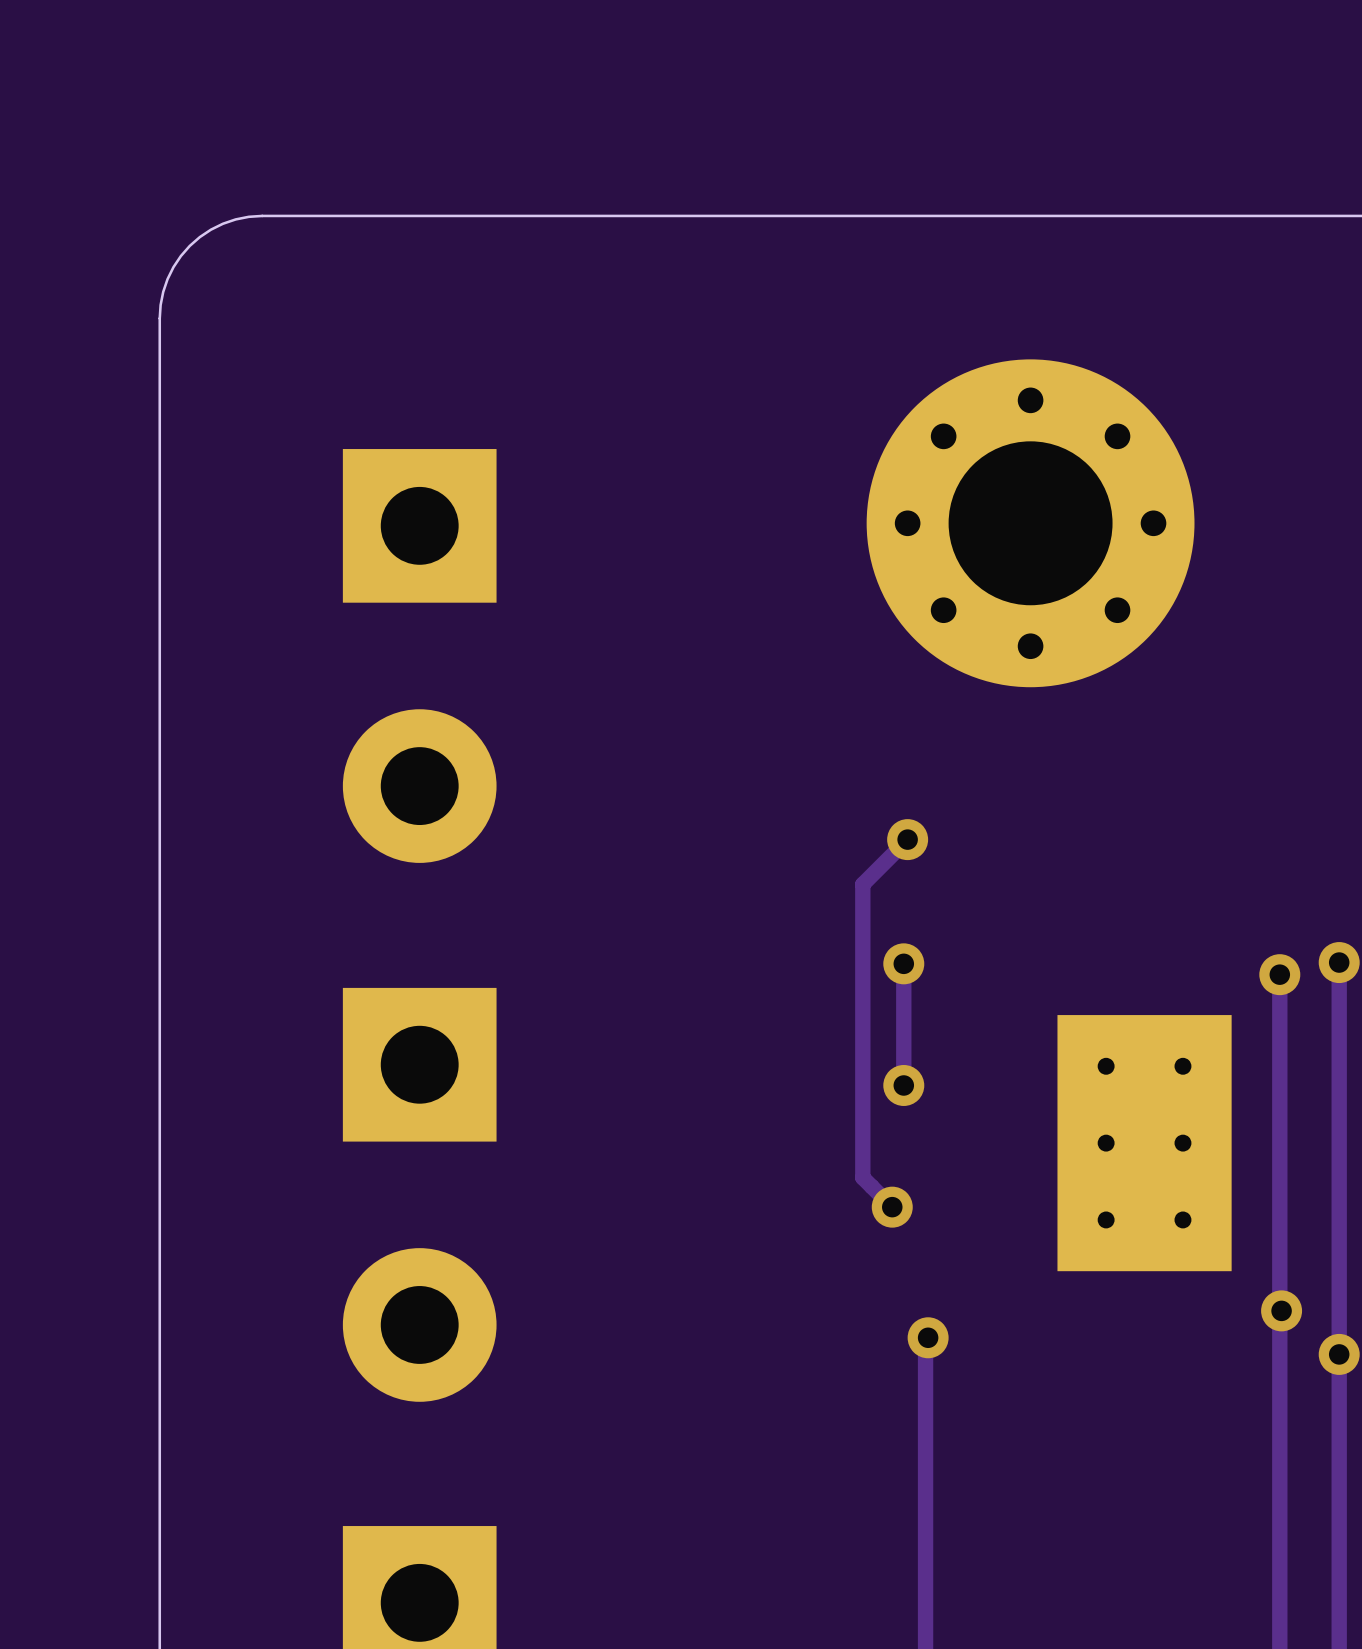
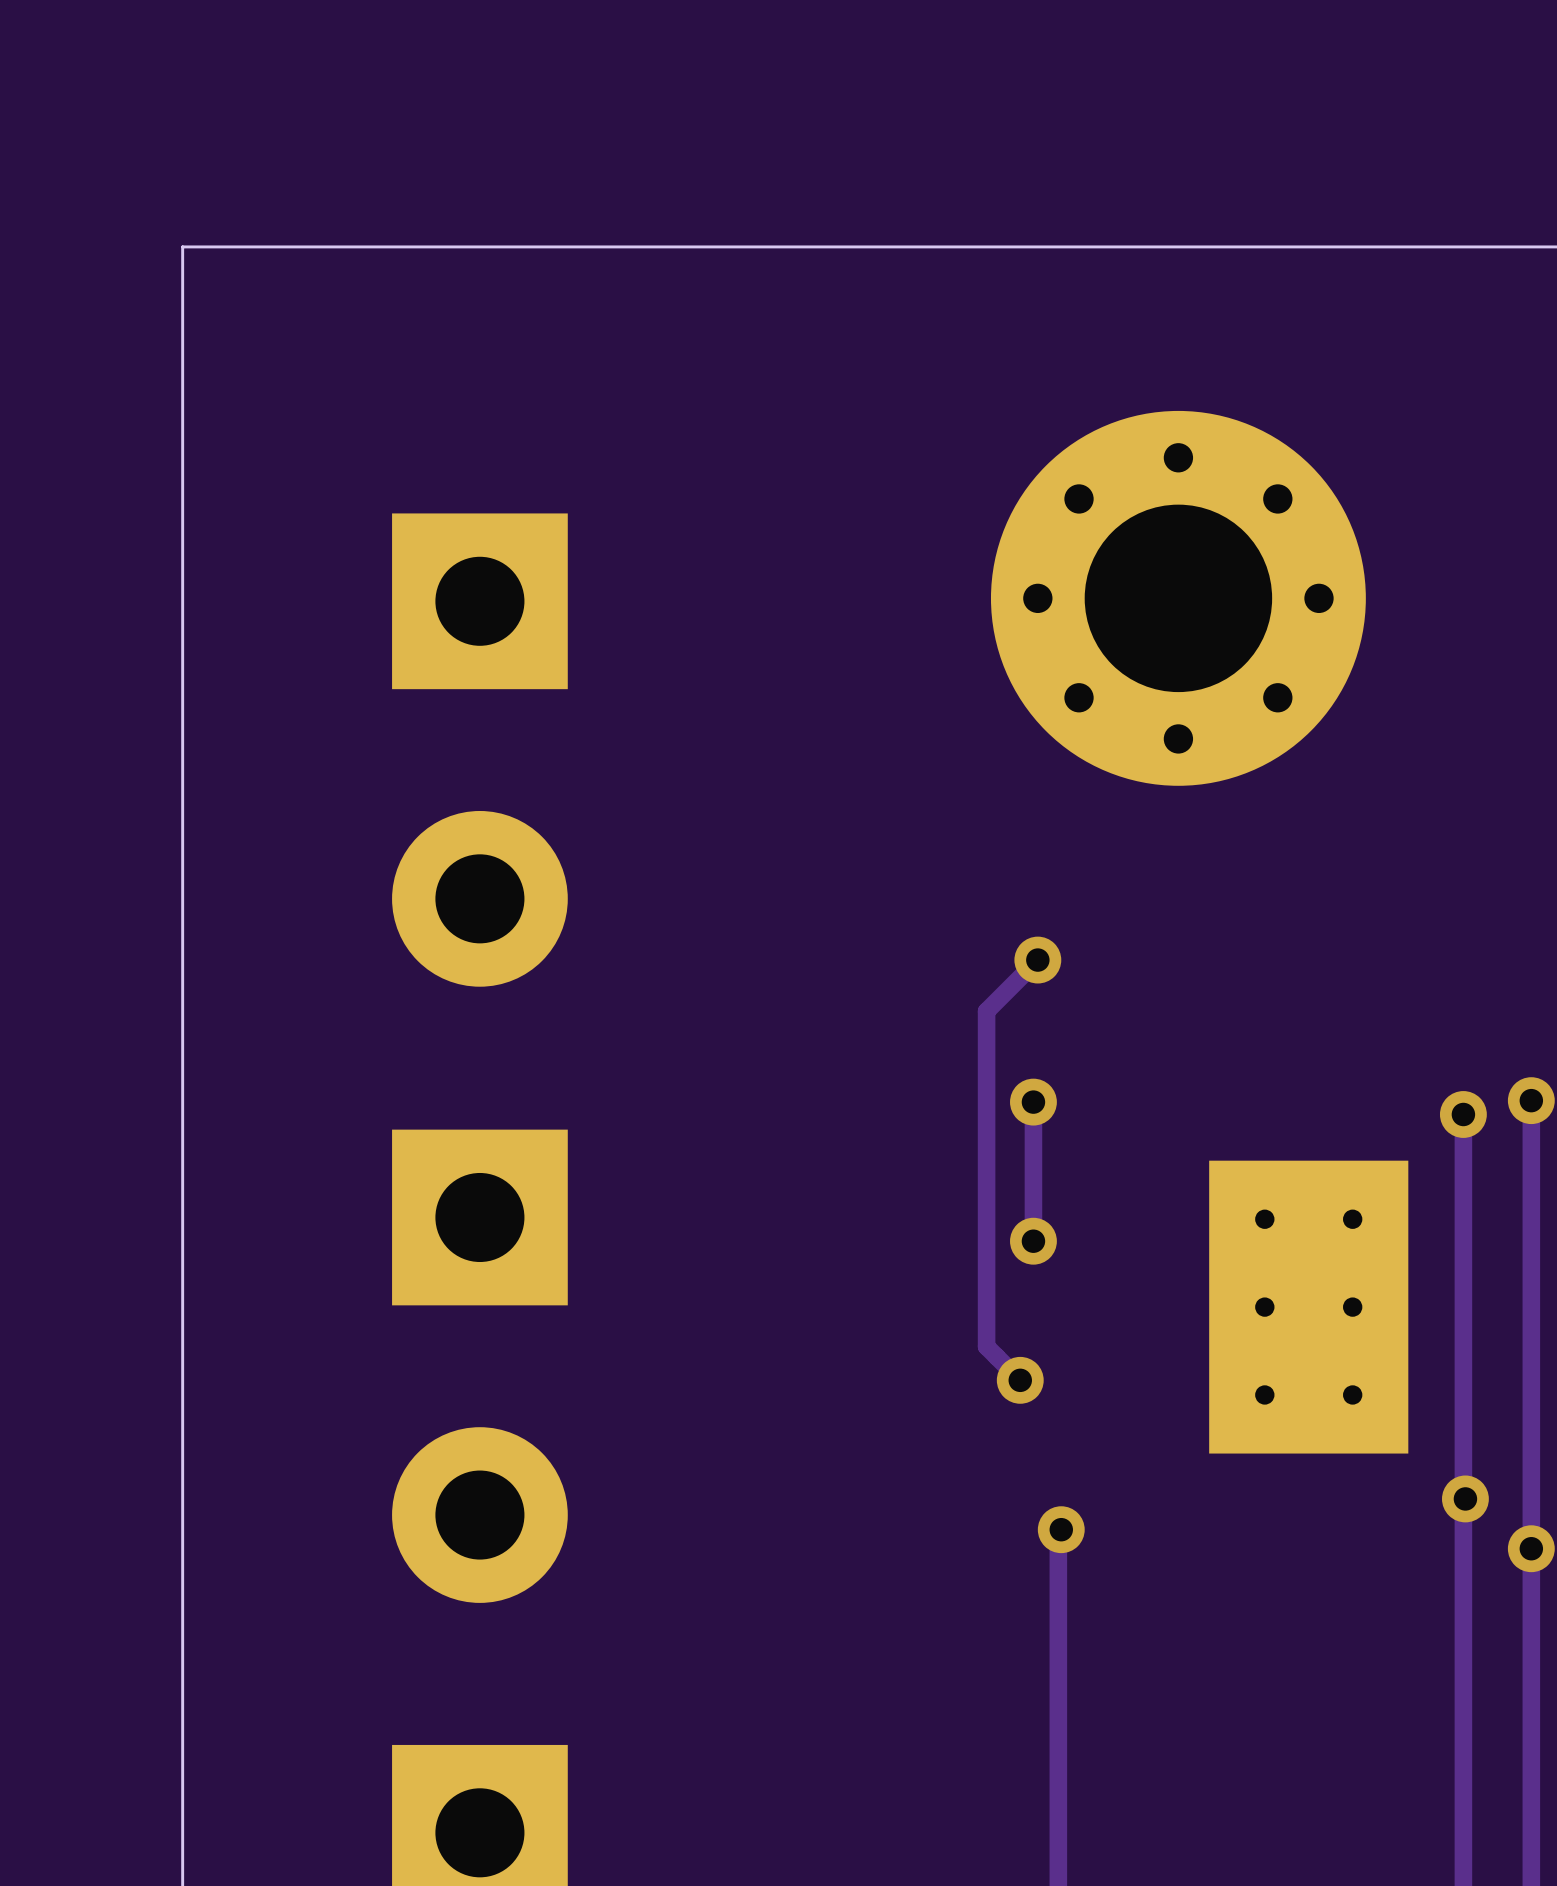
board edge: (262, 215) (235, 219) (222, 223) (210, 229) (189, 245) (180, 256) (167, 279) (160, 305) (159, 318) -> (299, 246) (182, 246) (182, 364)

